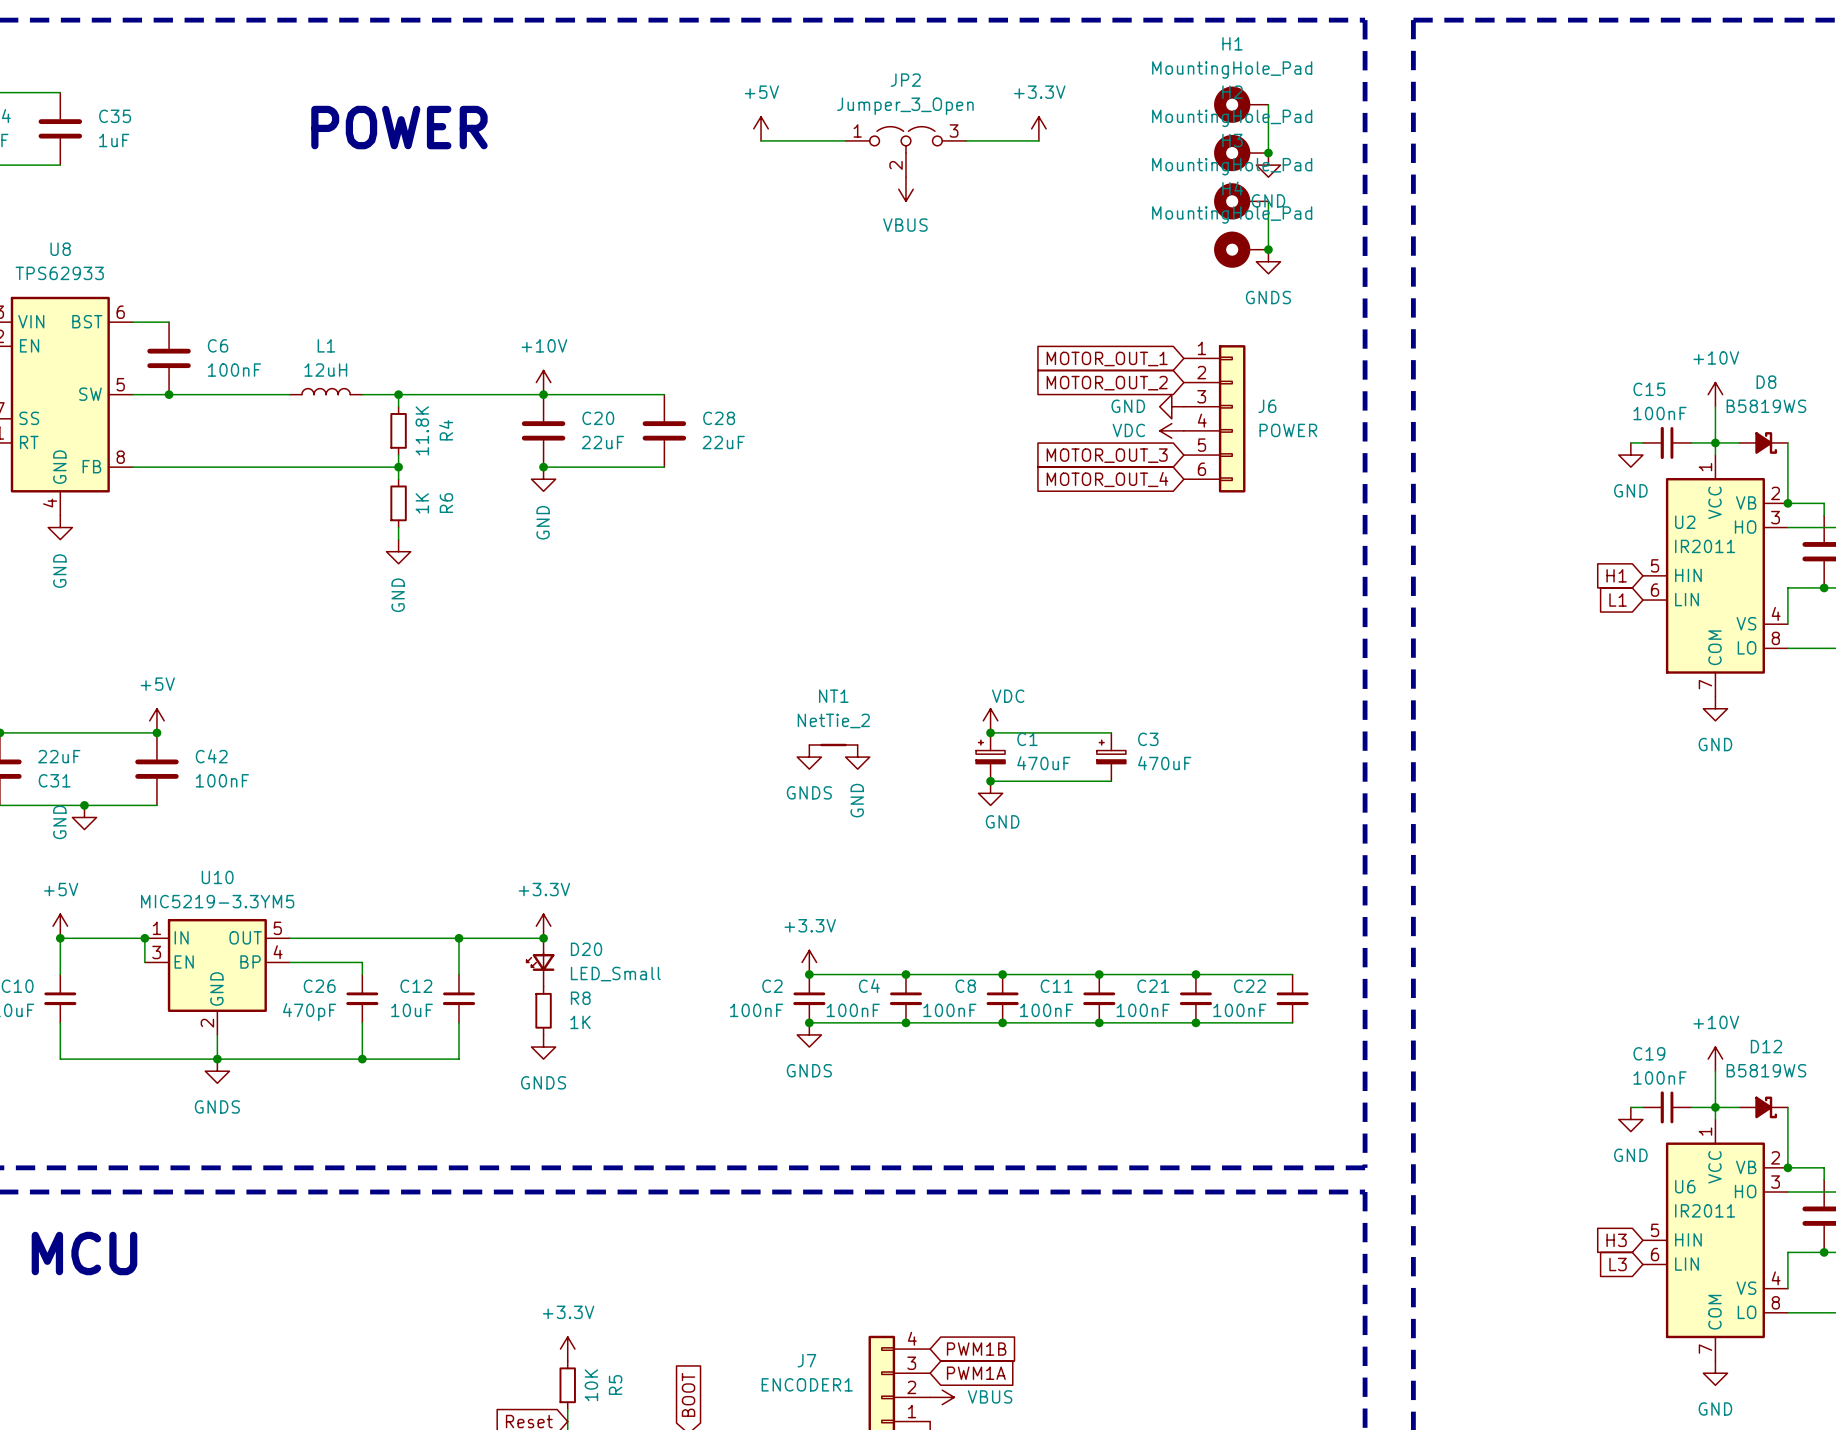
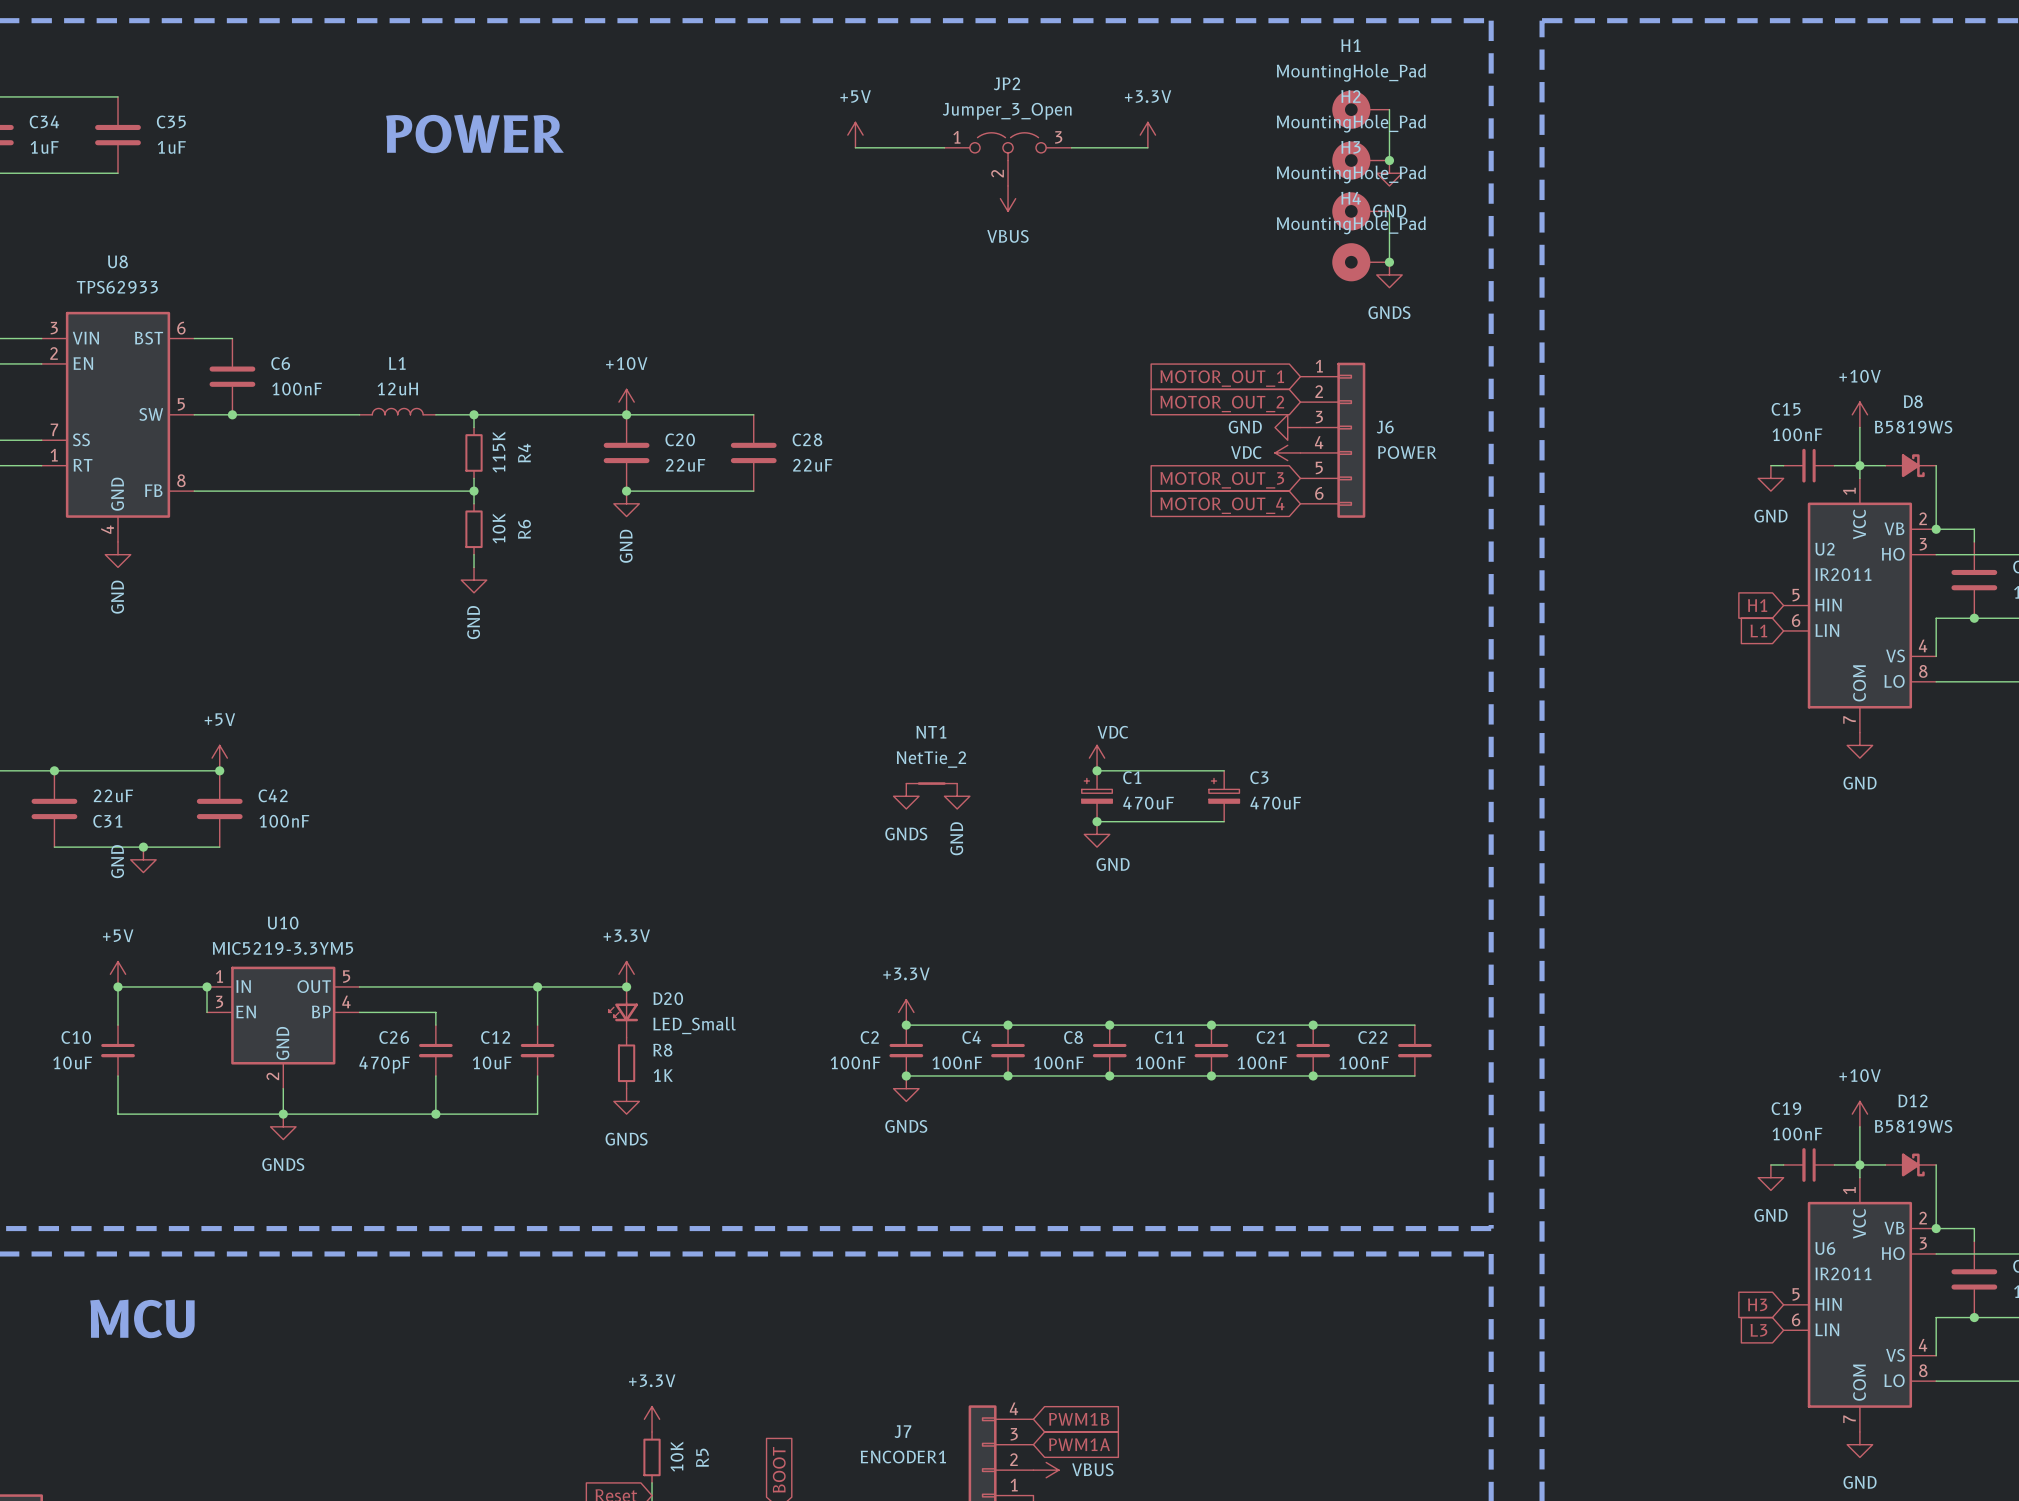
R4 value: 11.8K (422, 430) -> 115K (498, 452)
R6 value: 1K (422, 503) -> 10K (499, 528)

